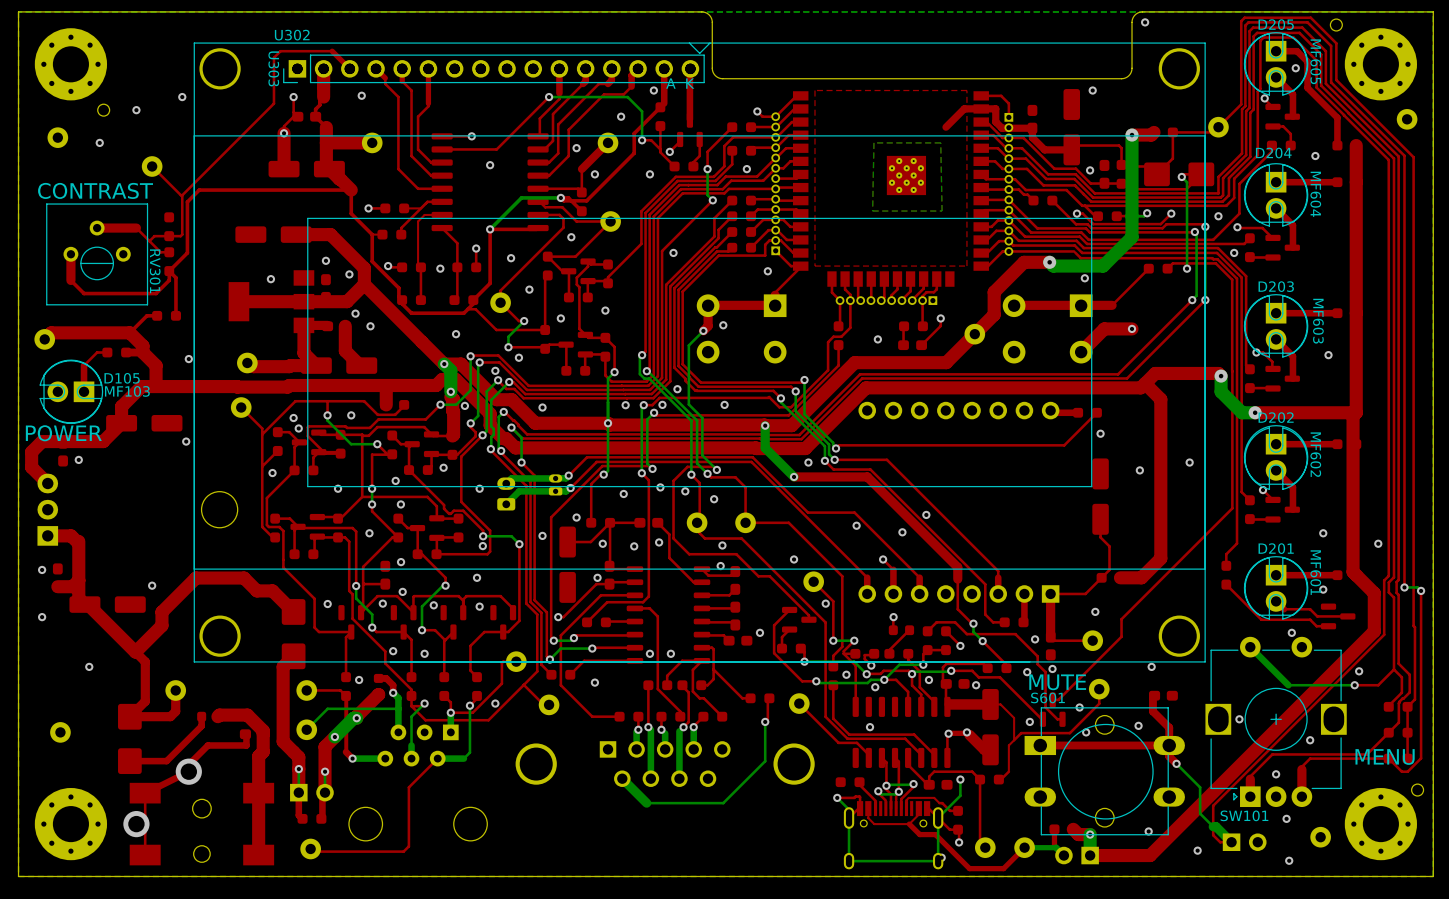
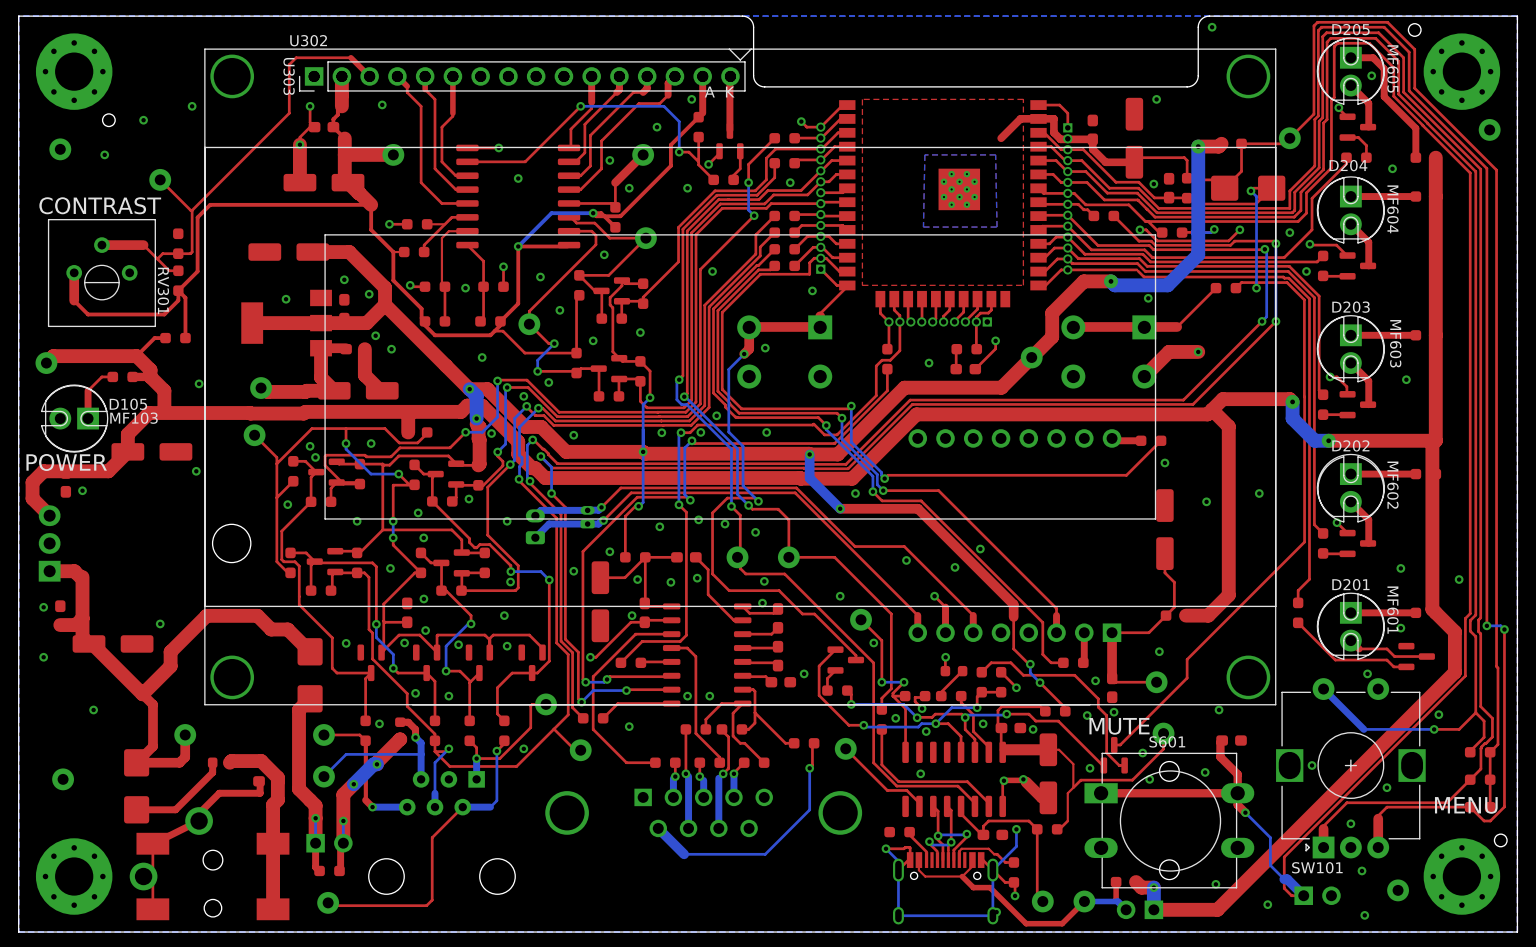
S601 name position: S601 (1047, 697) -> S601 (1167, 741)

